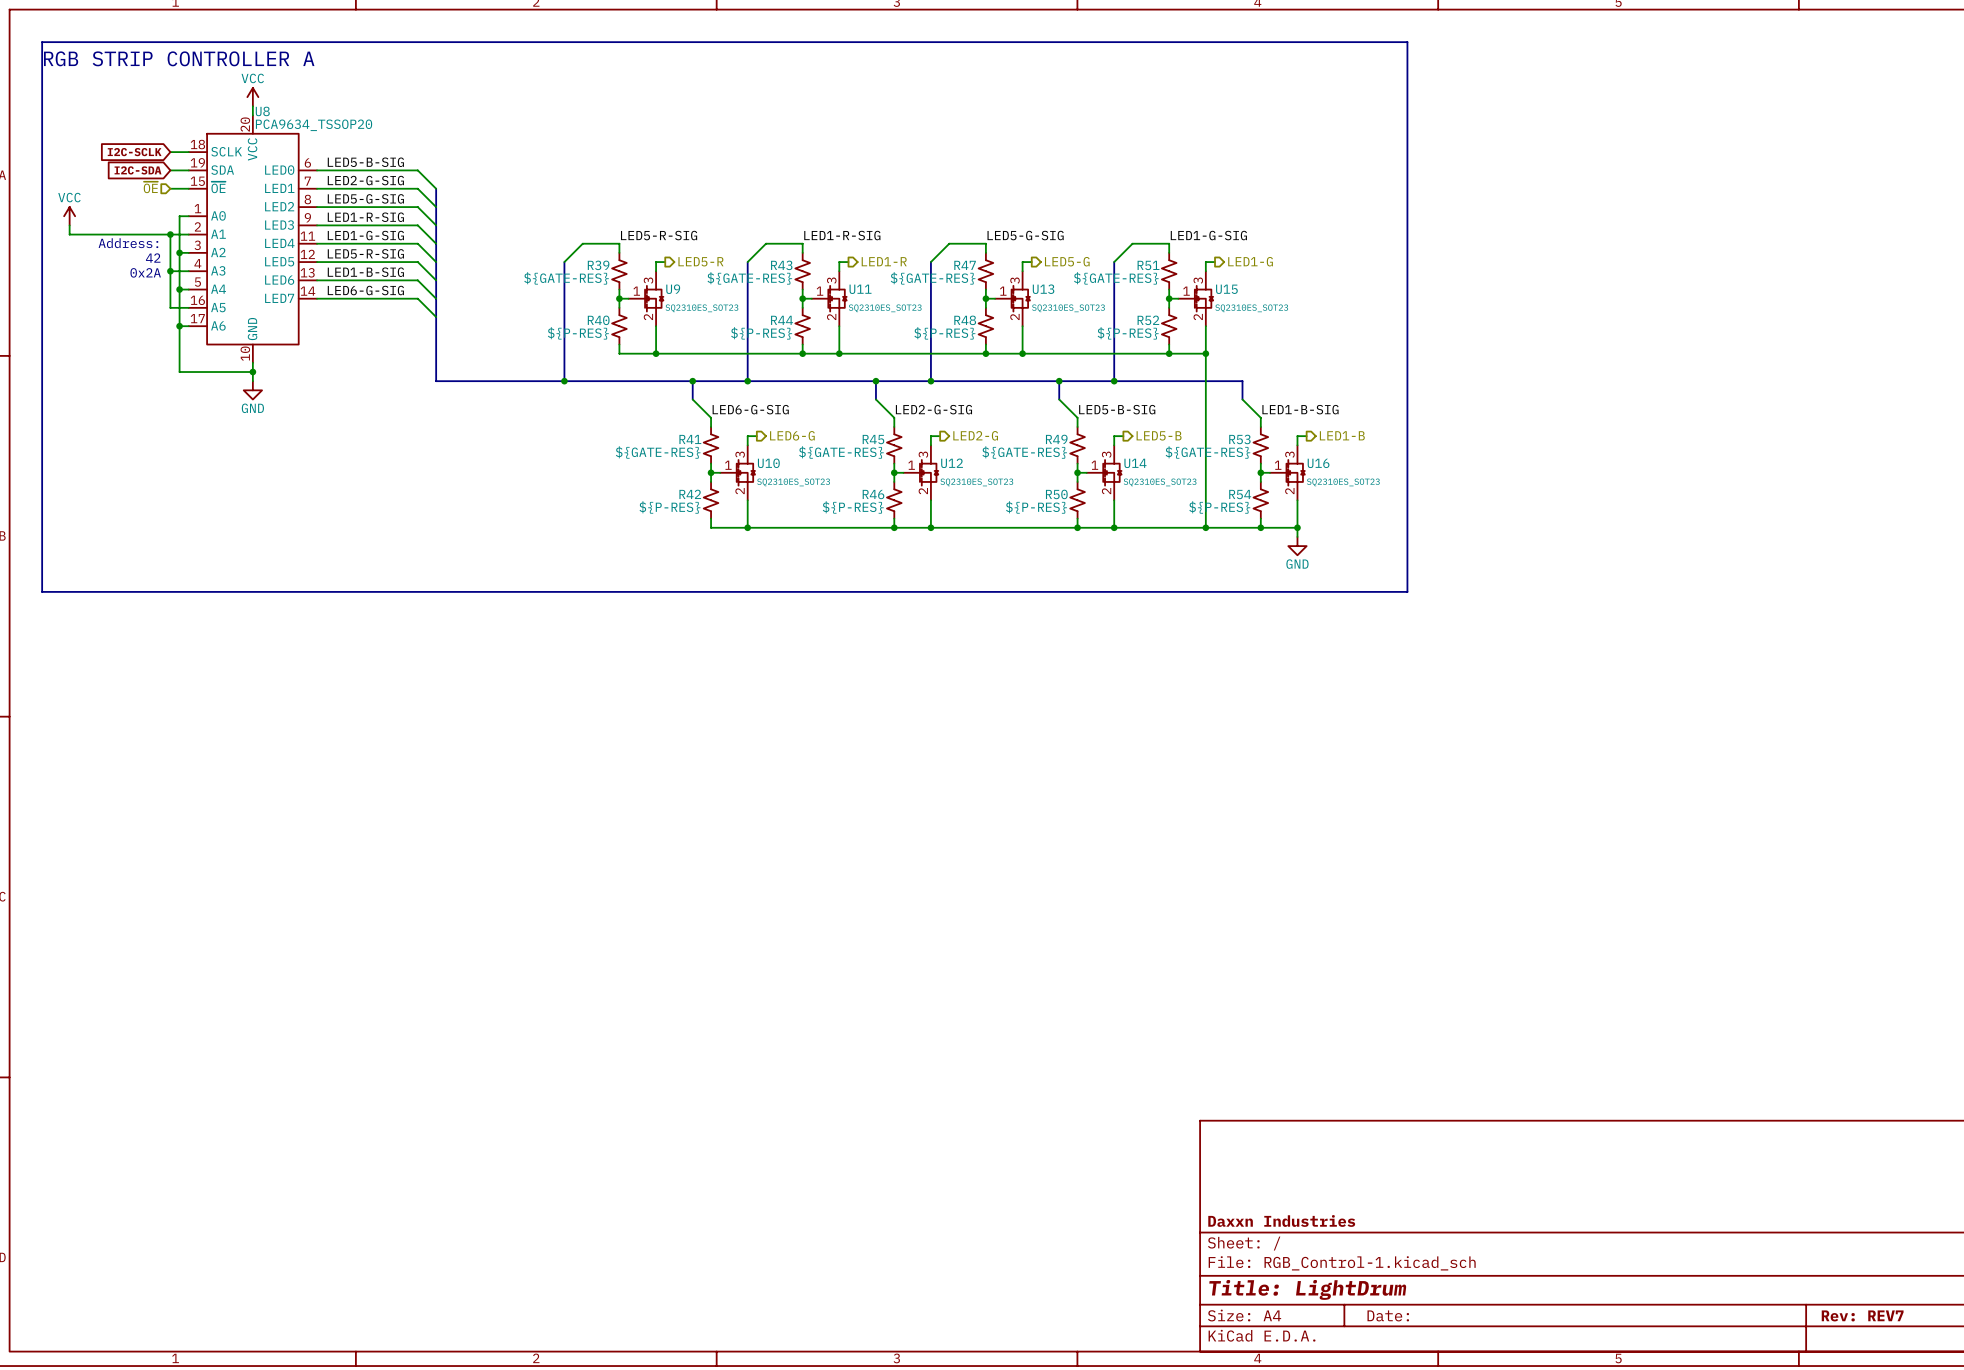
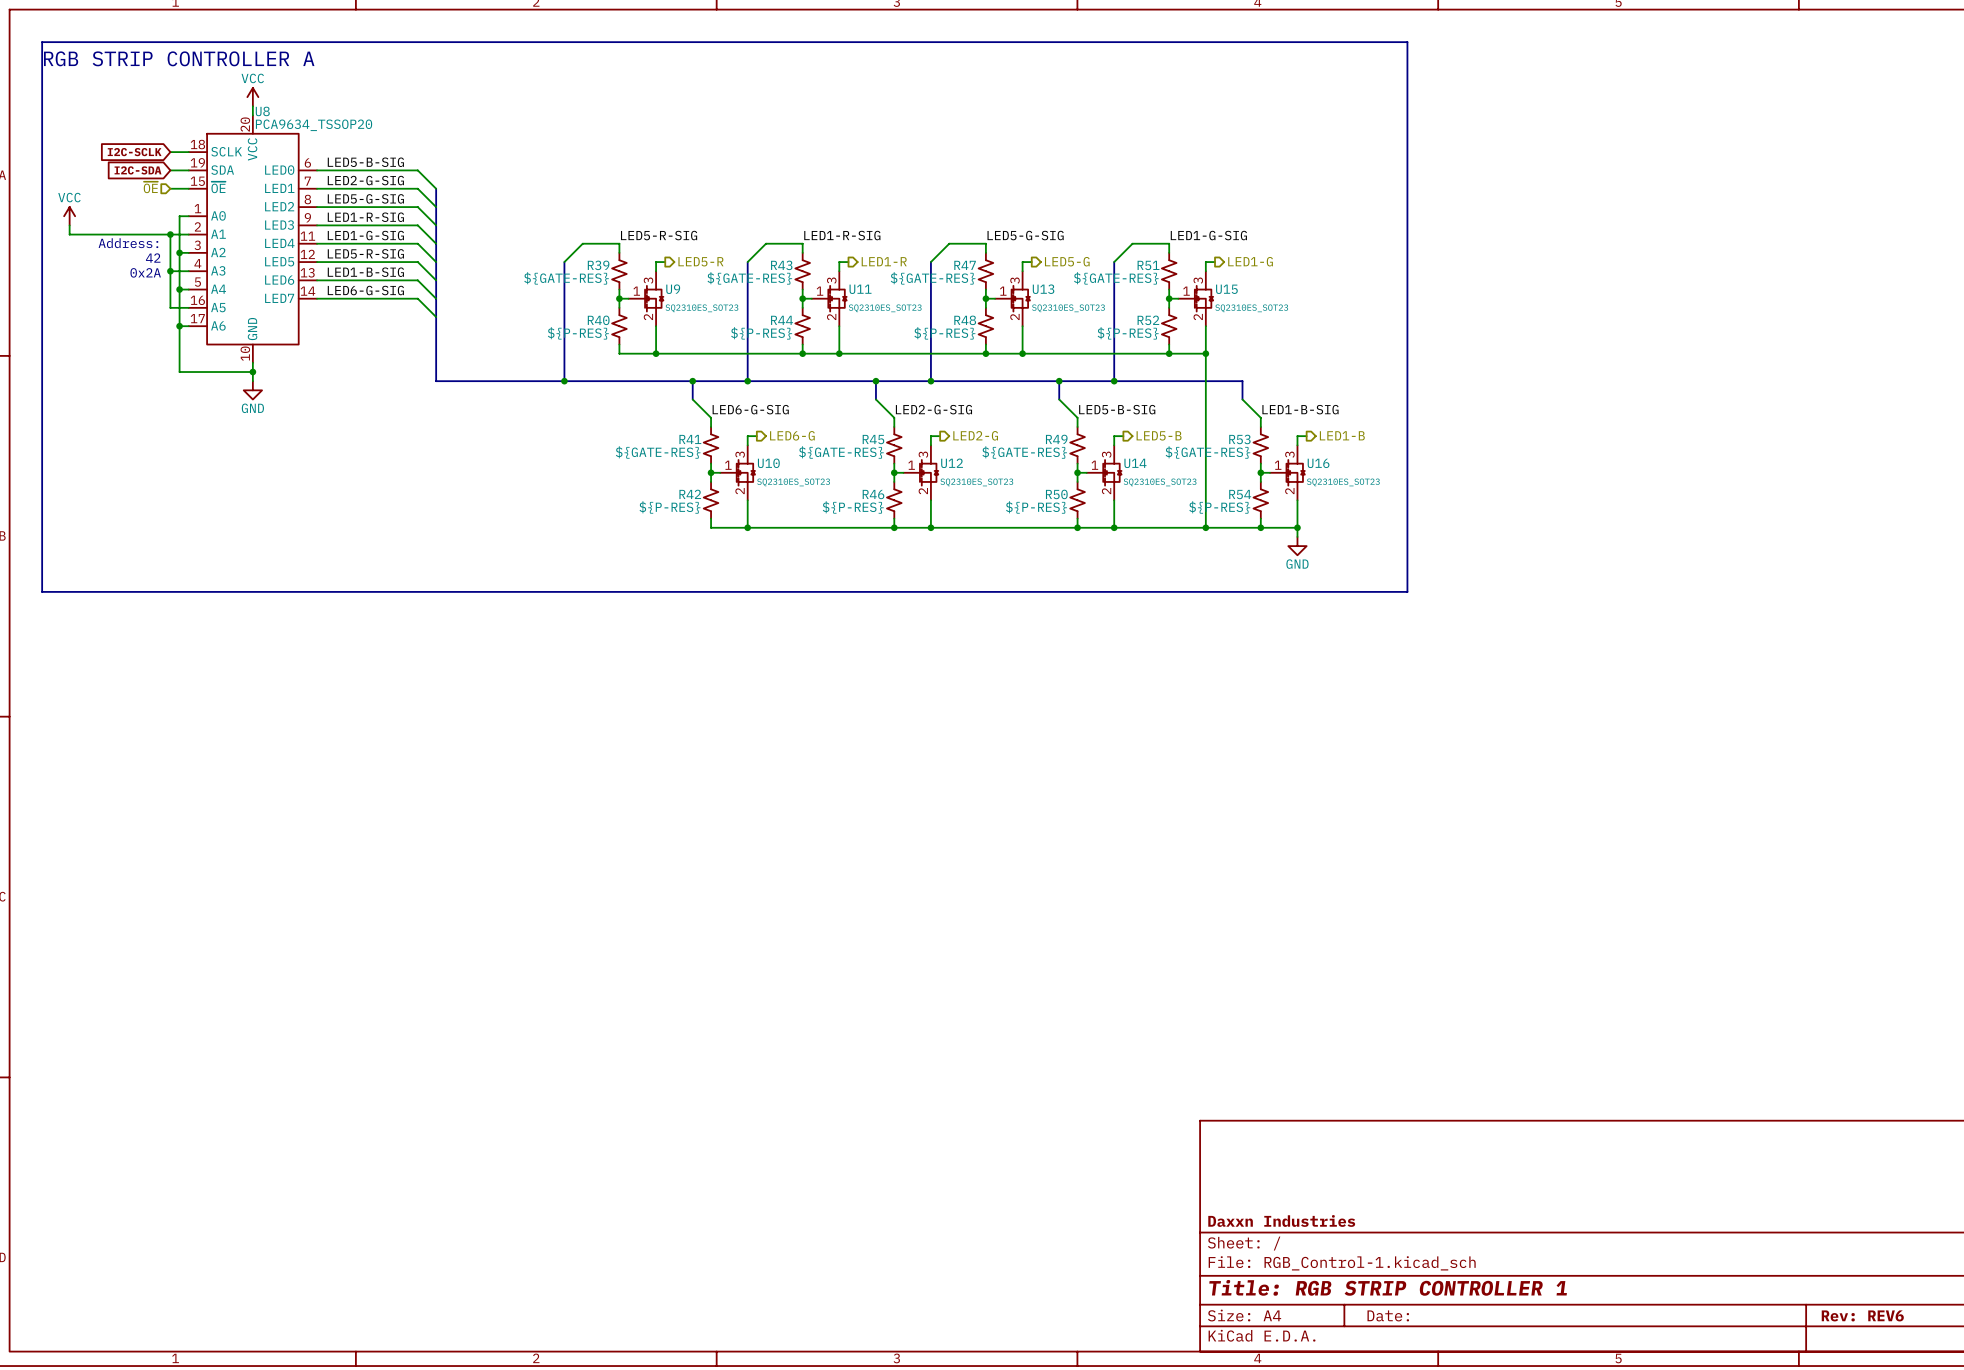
title block: Title: LightDrum (1307, 1289) -> Title: RGB STRIP CONTROLLER 1 (1388, 1287)
title block: Rev: REV7 (1862, 1315) -> Rev: REV6 (1862, 1315)

